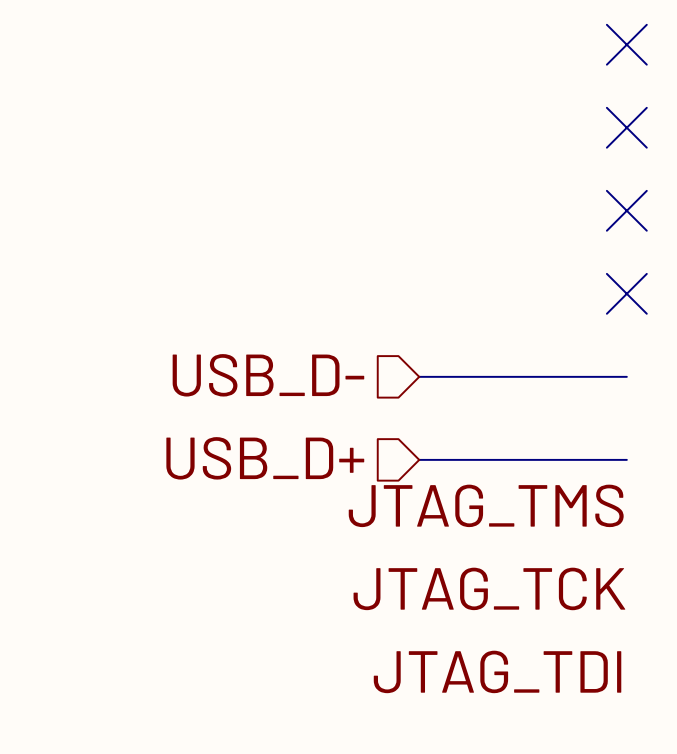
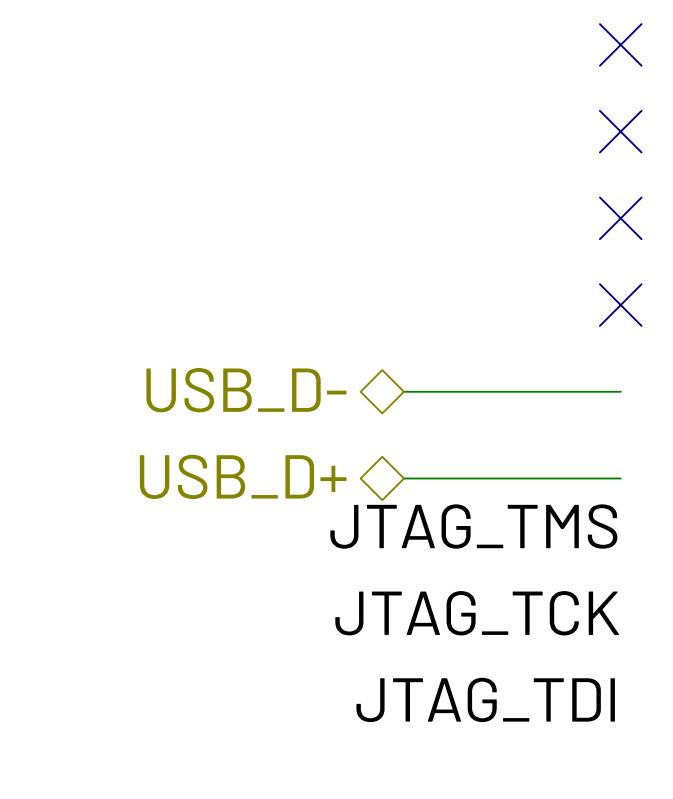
hierarchical label shape: input (268, 375) -> bidirectional (246, 390)
hierarchical label shape: input (265, 458) -> bidirectional (243, 476)

